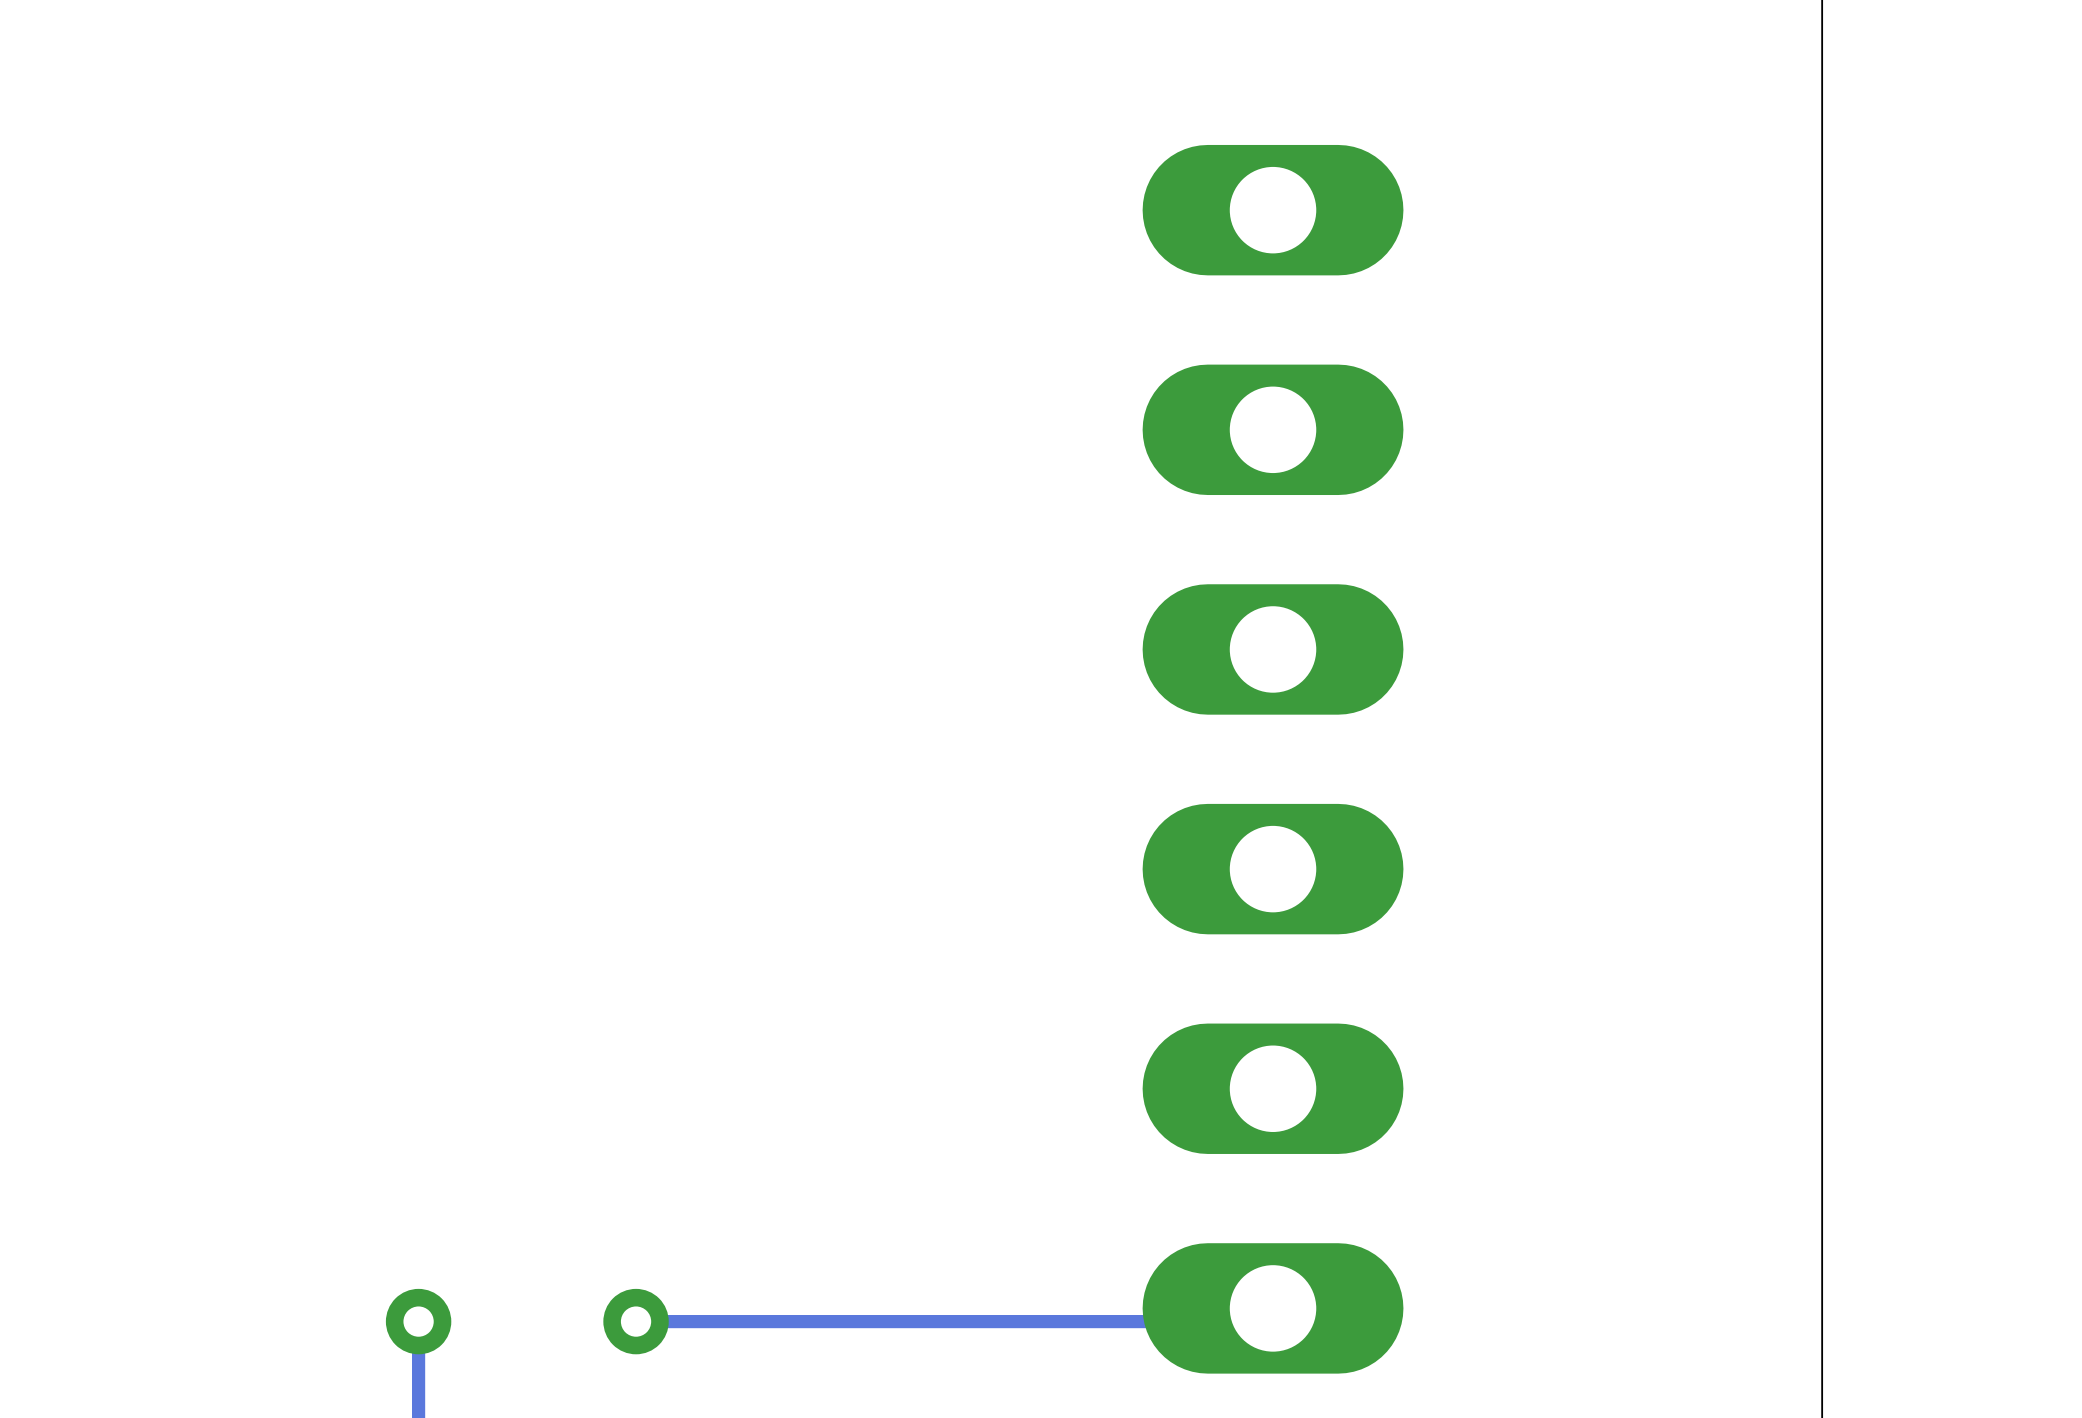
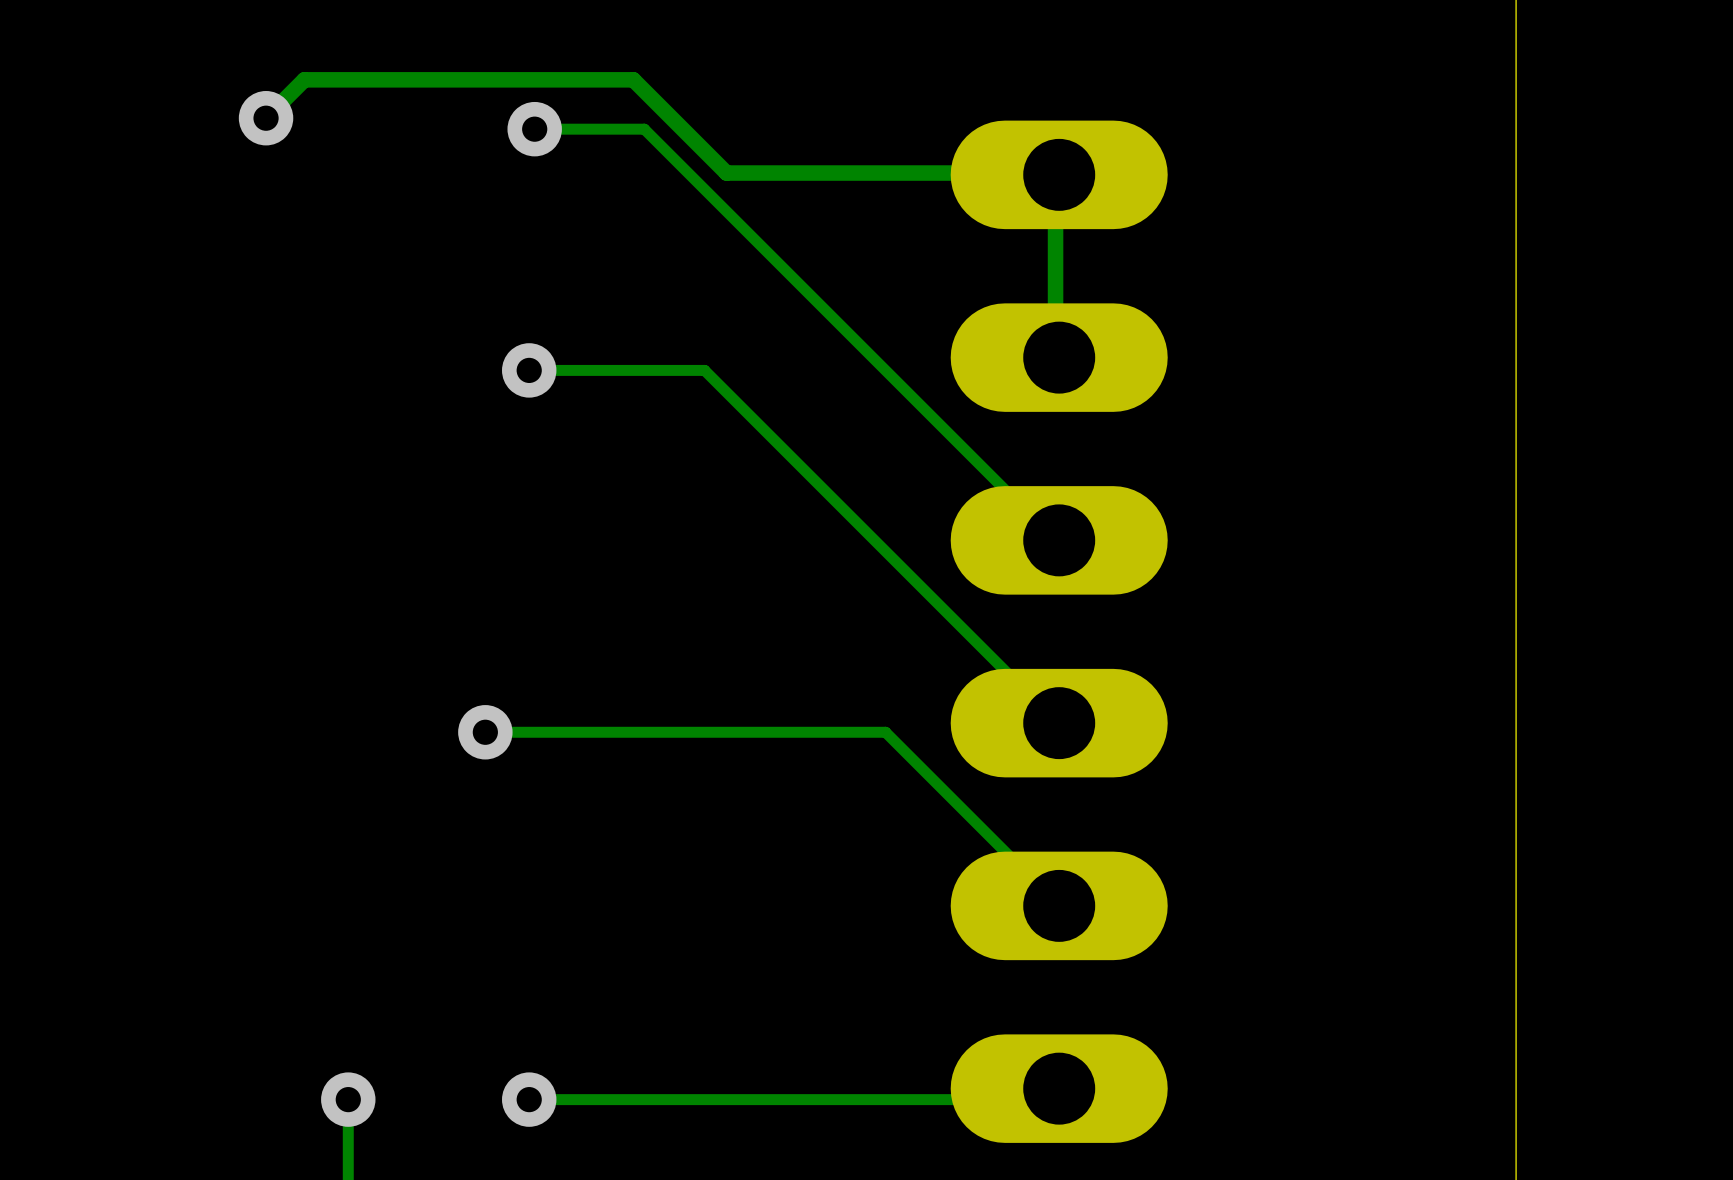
track: none -> (266, 118) (304, 79) (633, 79) (726, 173) (1050, 173) (1059, 174) (1055, 178) (1055, 353) (1059, 357)
via: none -> (266, 118)
track: none -> (534, 129) (644, 129) (1055, 540) (1059, 540)
via: none -> (534, 129)
track: none -> (529, 370) (704, 370) (1059, 723)
via: none -> (529, 370)
track: none -> (485, 732) (885, 732) (1059, 905)
via: none -> (485, 732)

